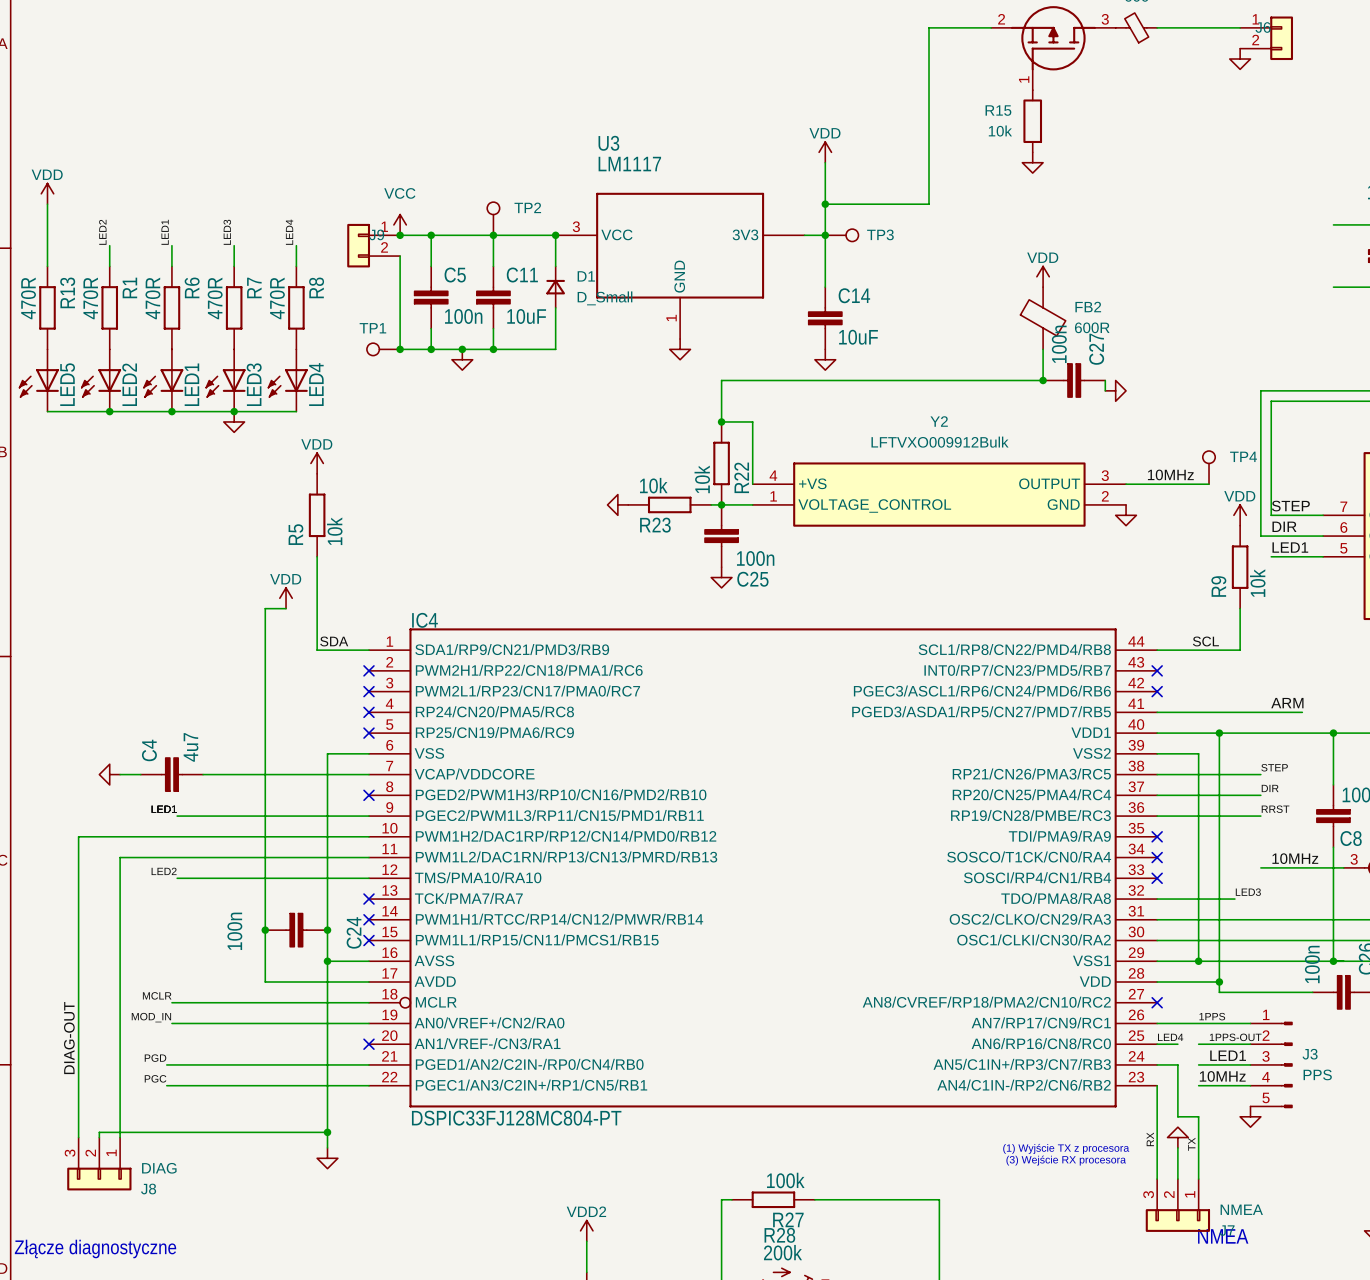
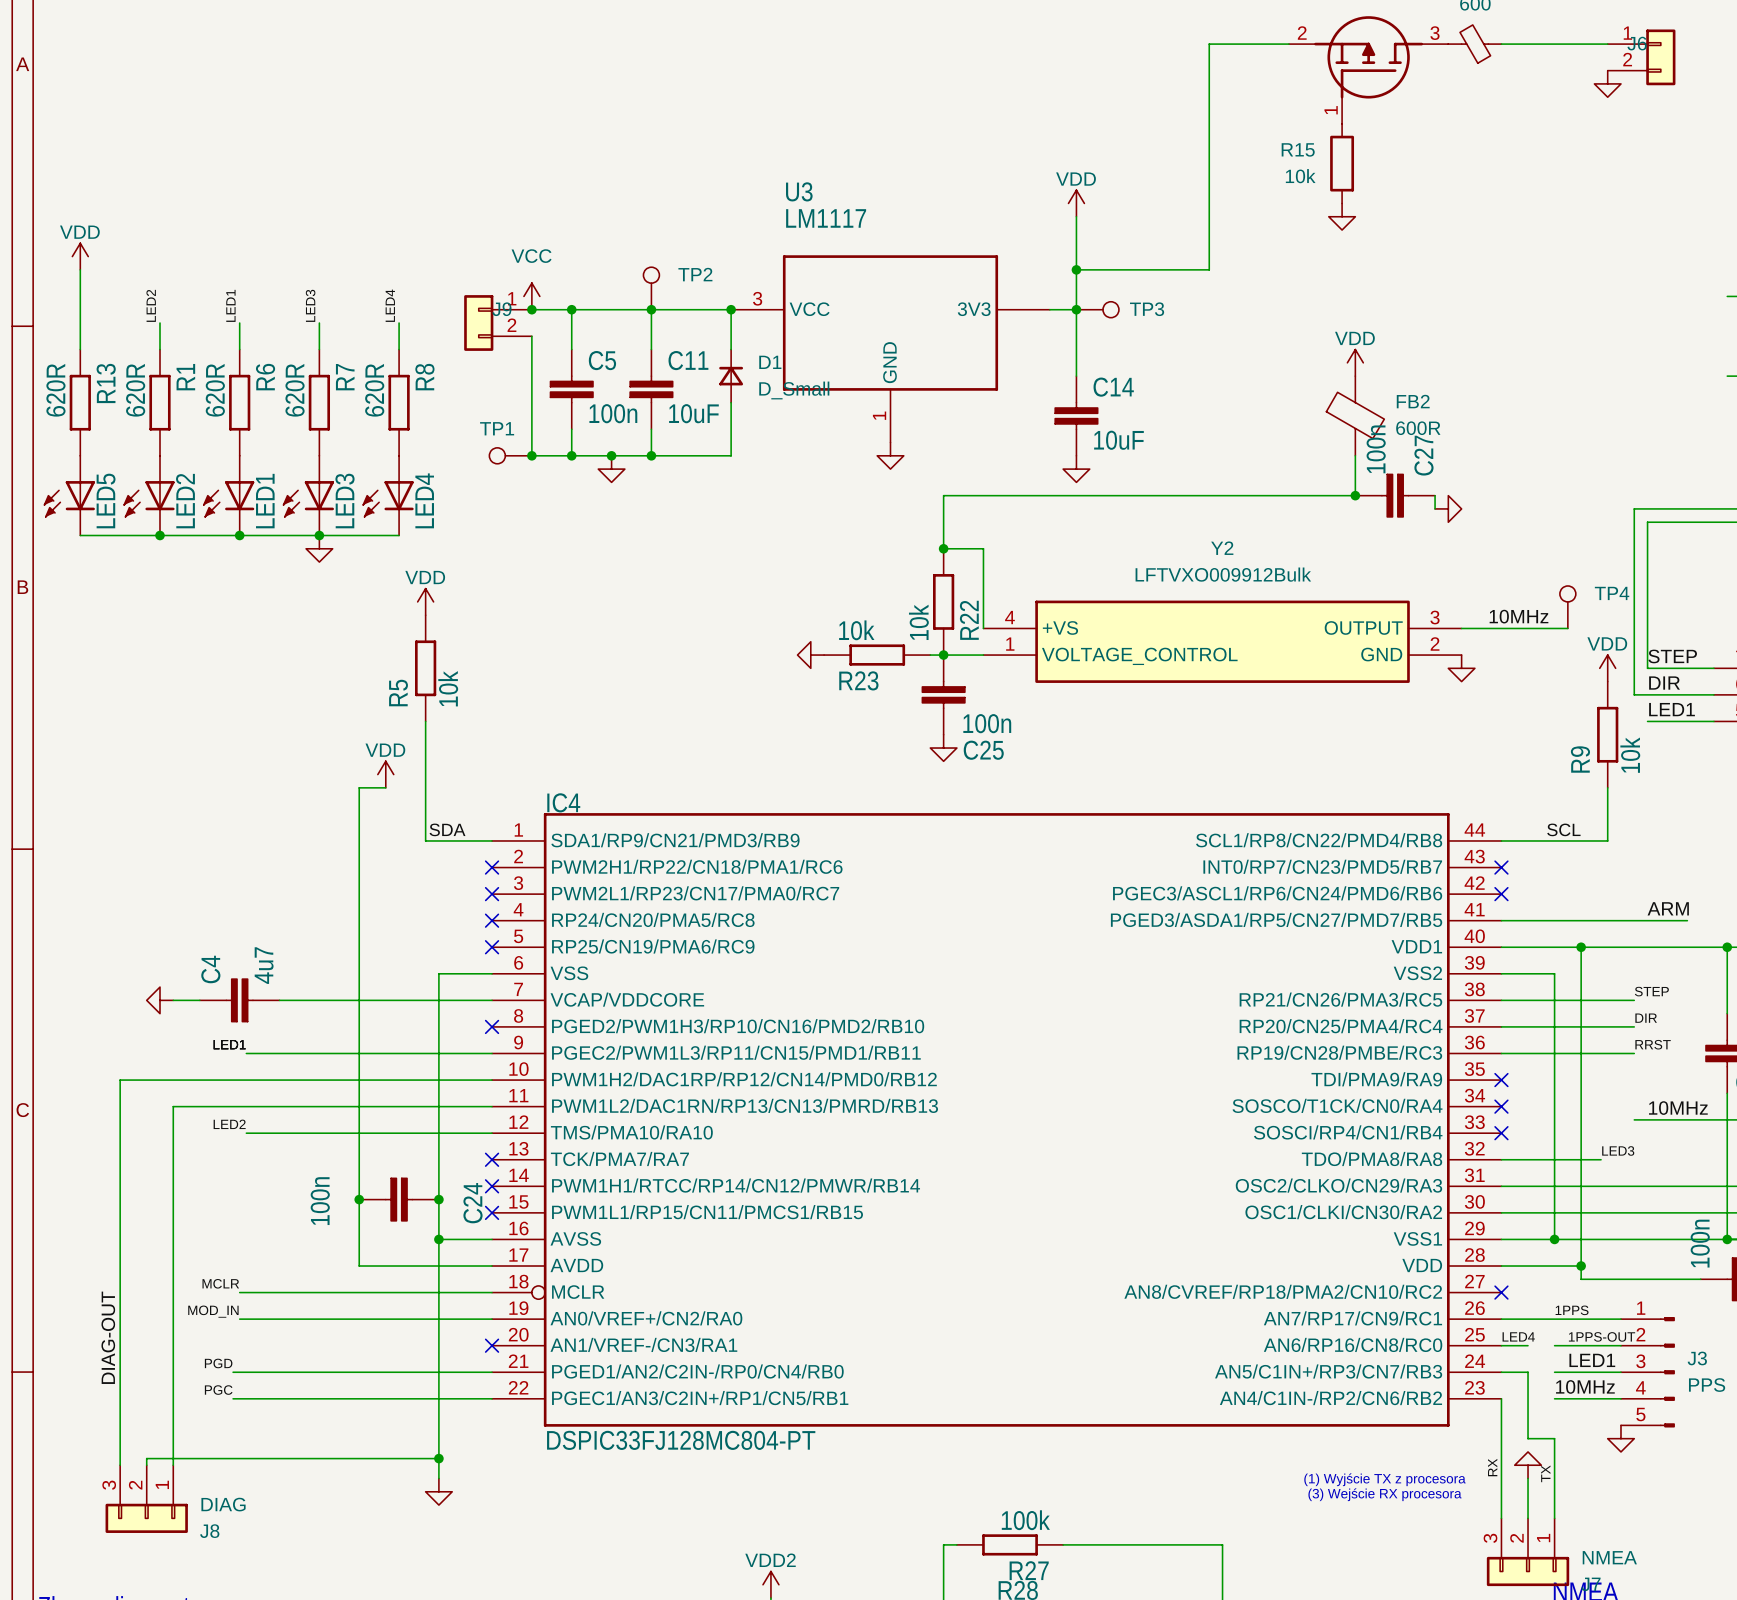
R13 value: 470R (28, 298) -> 620R (55, 390)
R1 value: 470R (90, 298) -> 620R (135, 390)
R6 value: 470R (152, 298) -> 620R (215, 390)
R7 value: 470R (215, 298) -> 620R (295, 390)
R8 value: 470R (277, 298) -> 620R (374, 390)

